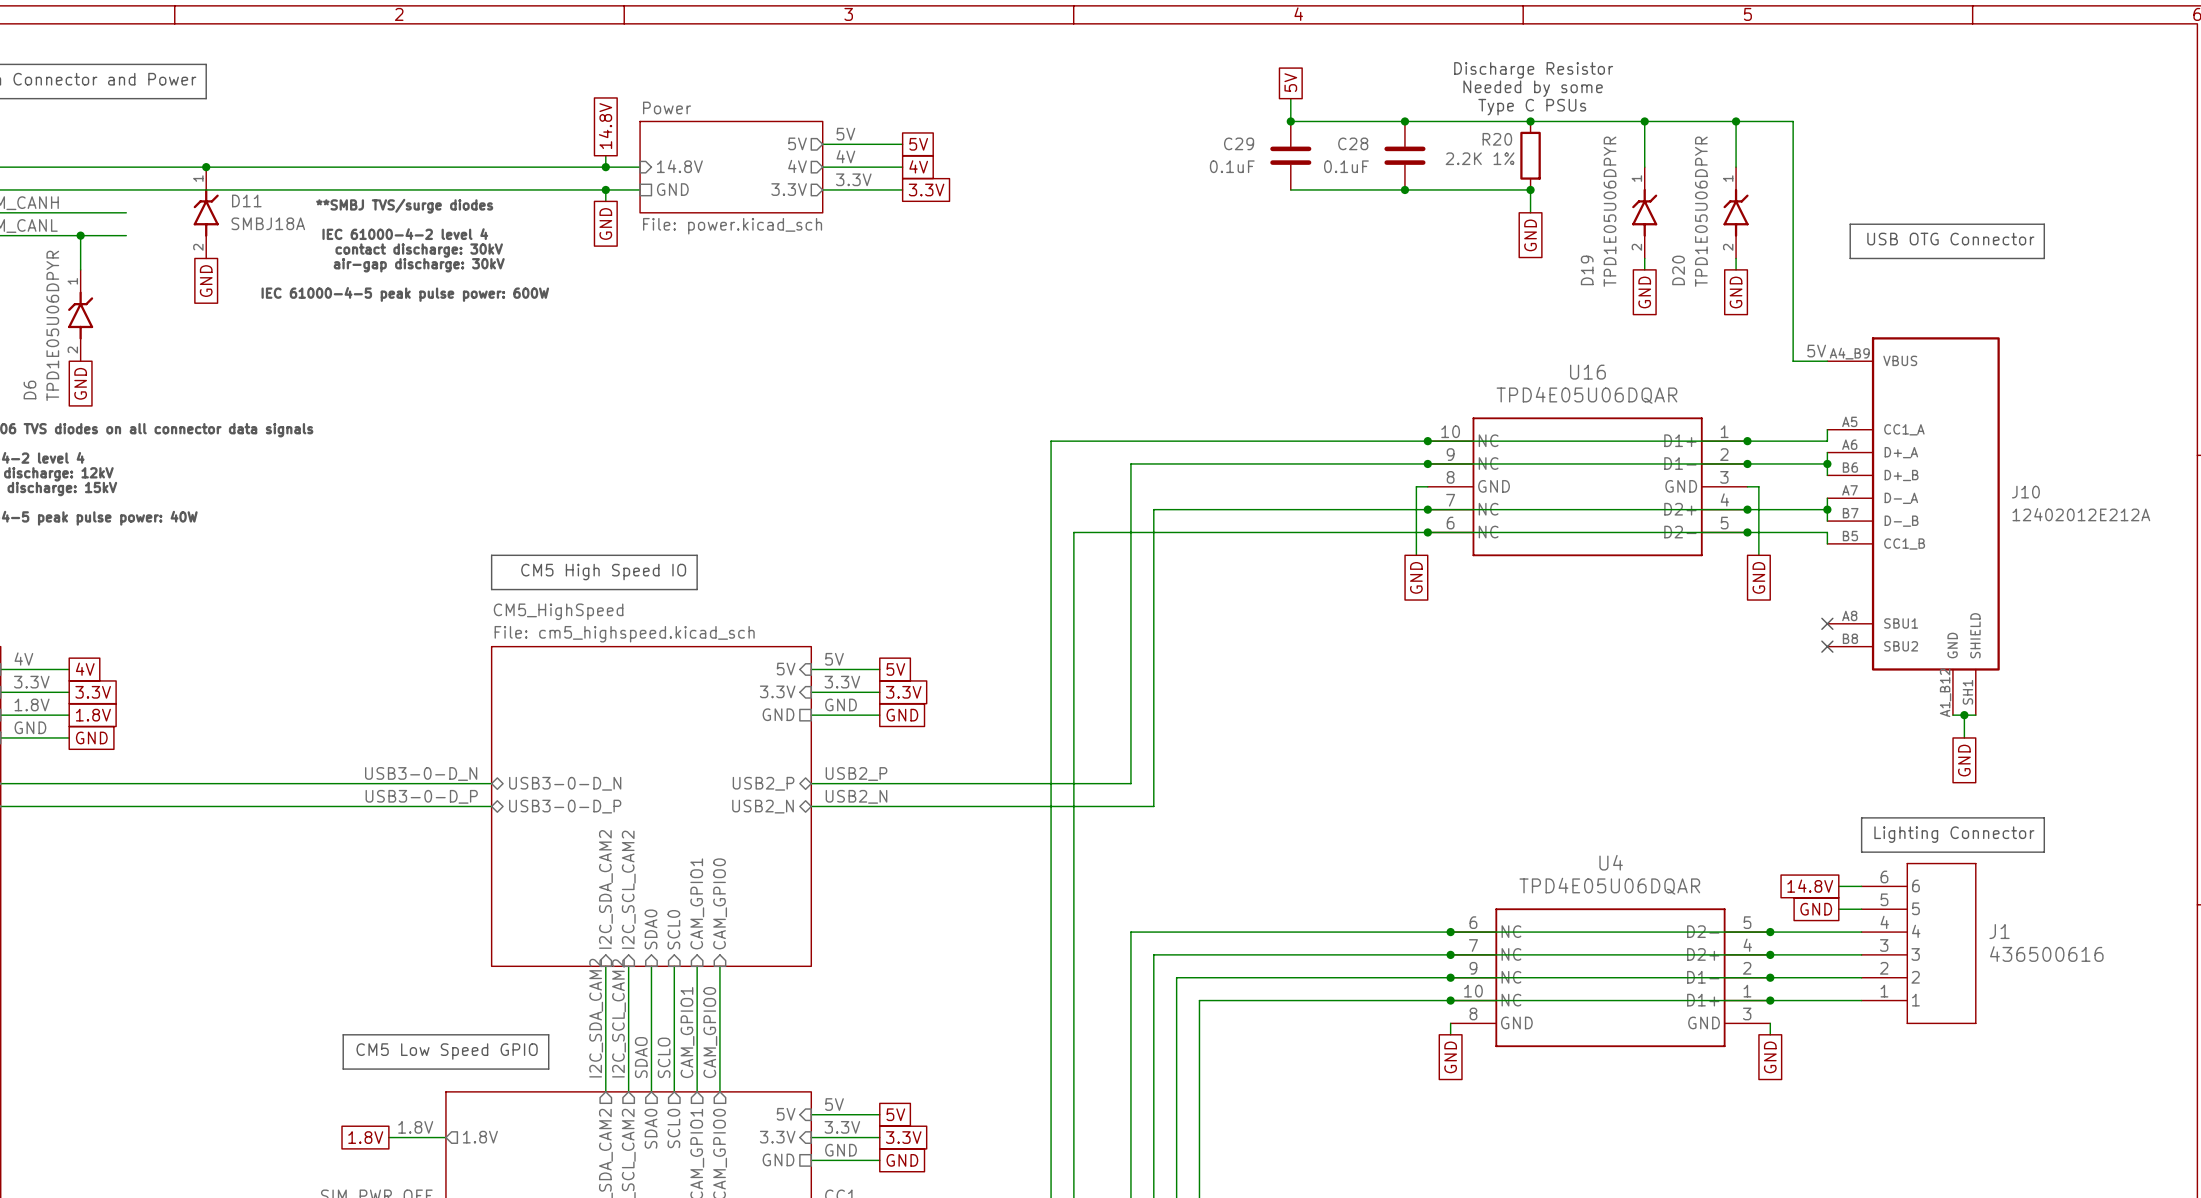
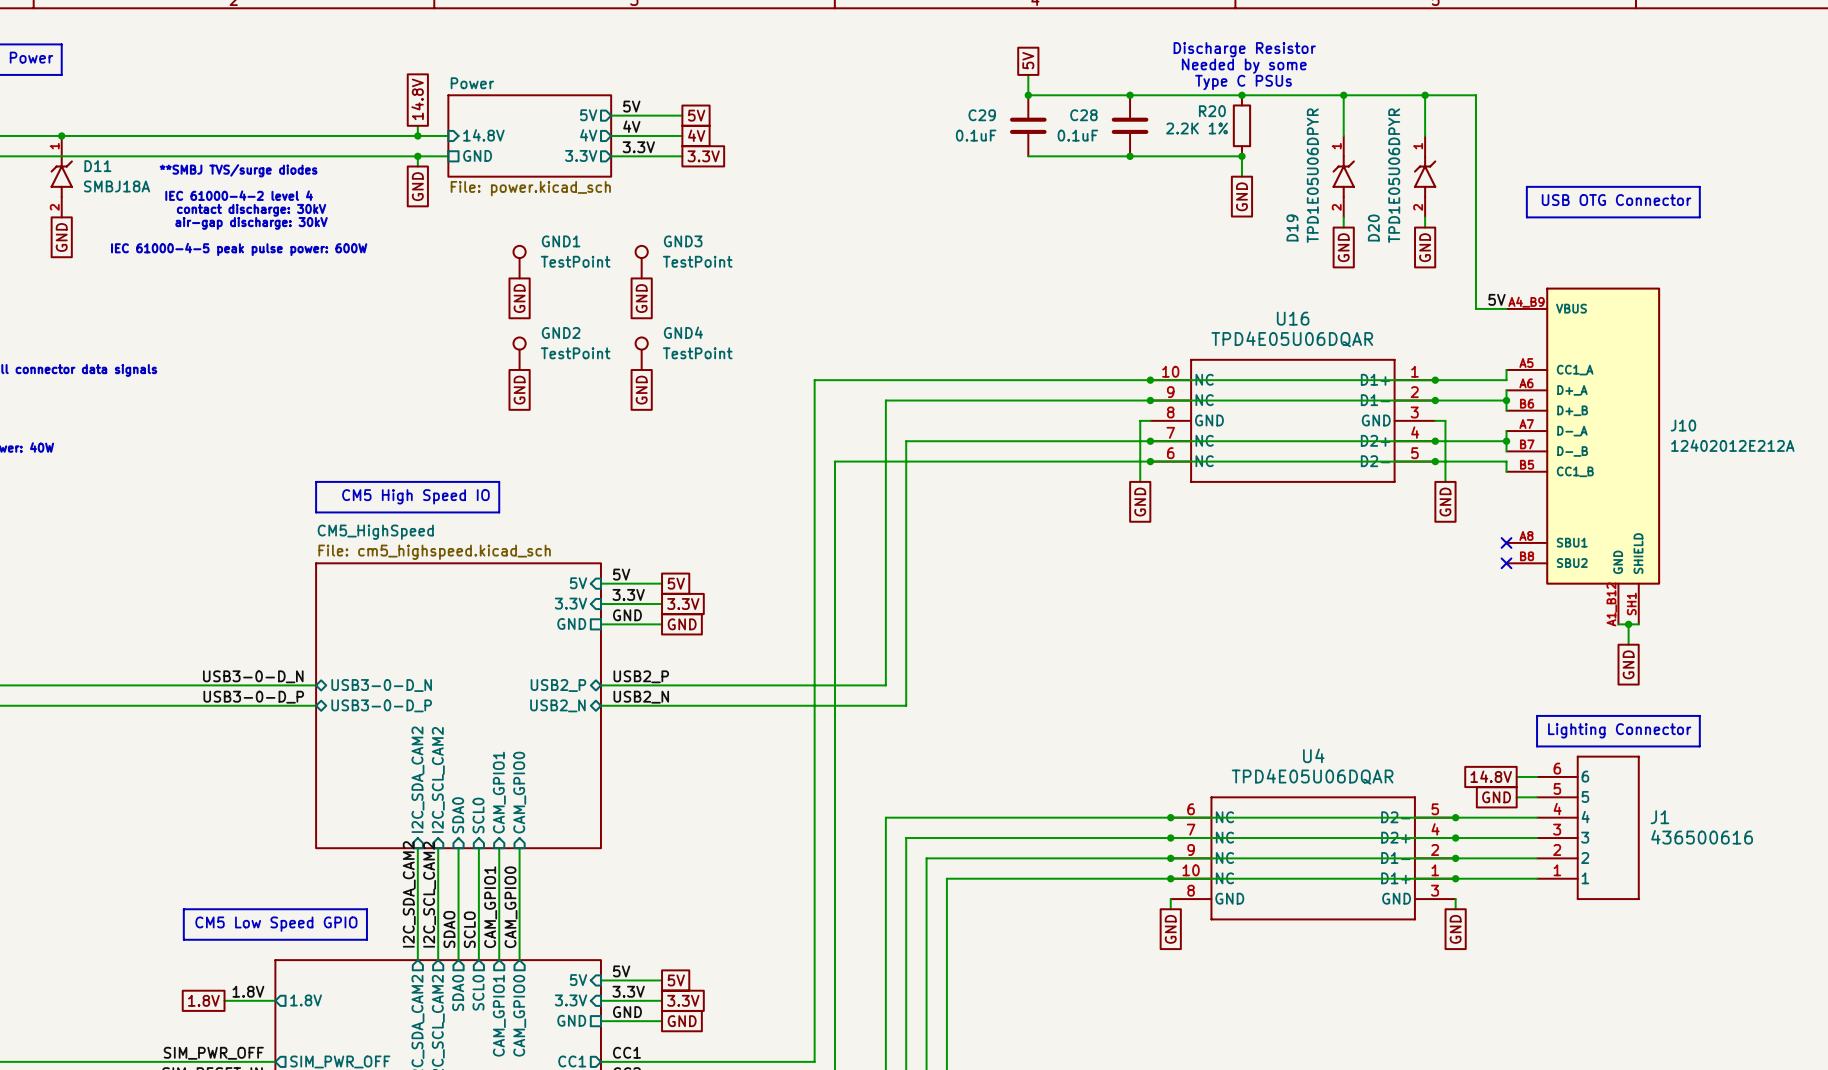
GND1: none -> TestPoint (519, 262)
GND3: none -> TestPoint (641, 262)
global label: none -> GND (519, 298)
global label: none -> GND (641, 298)
GND2: none -> TestPoint (519, 353)
GND4: none -> TestPoint (641, 353)
global label: none -> GND (519, 390)
global label: none -> GND (641, 390)

